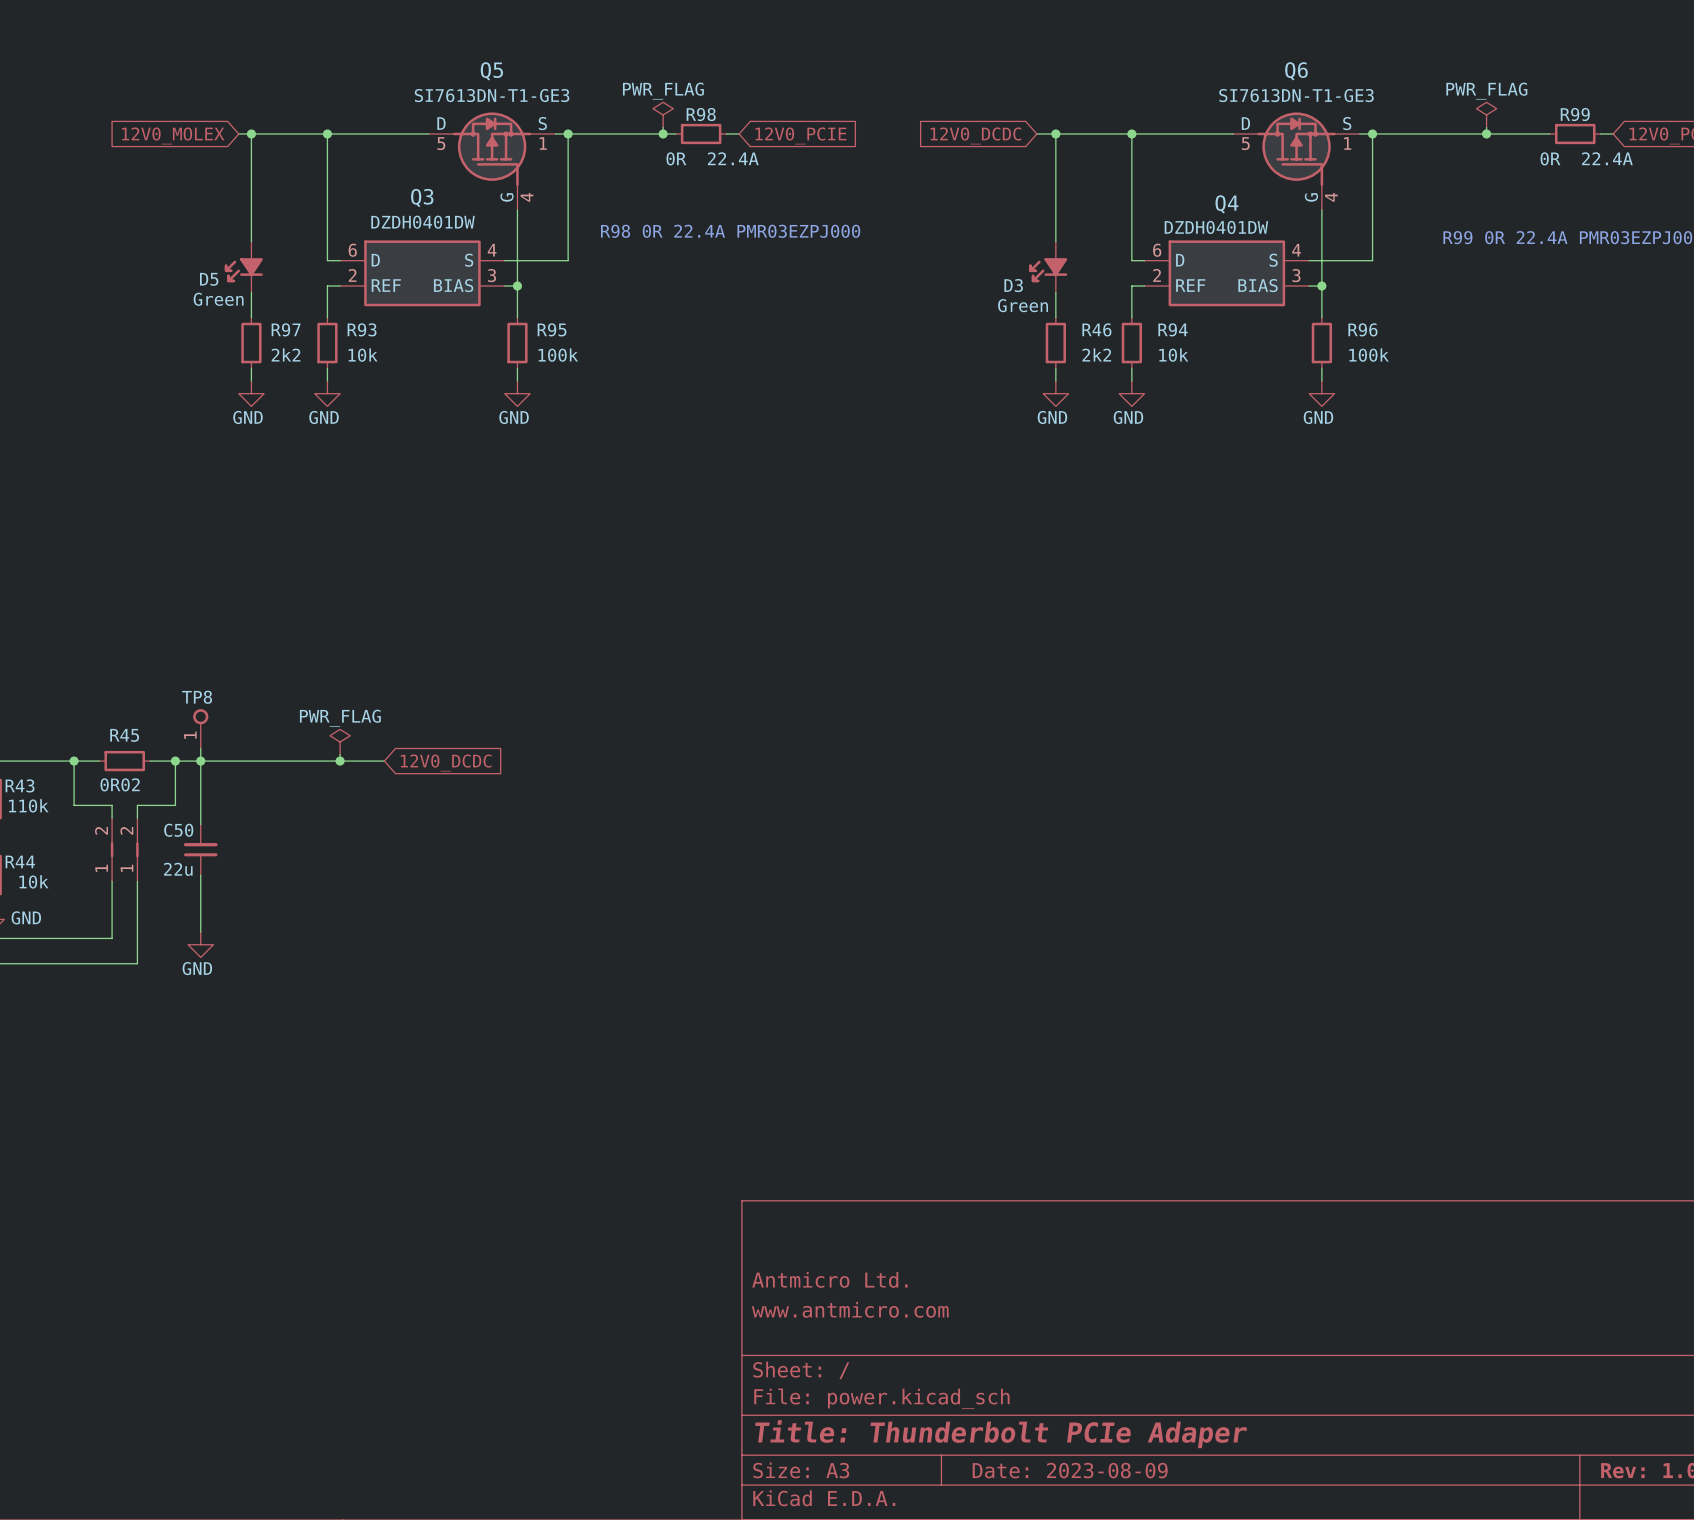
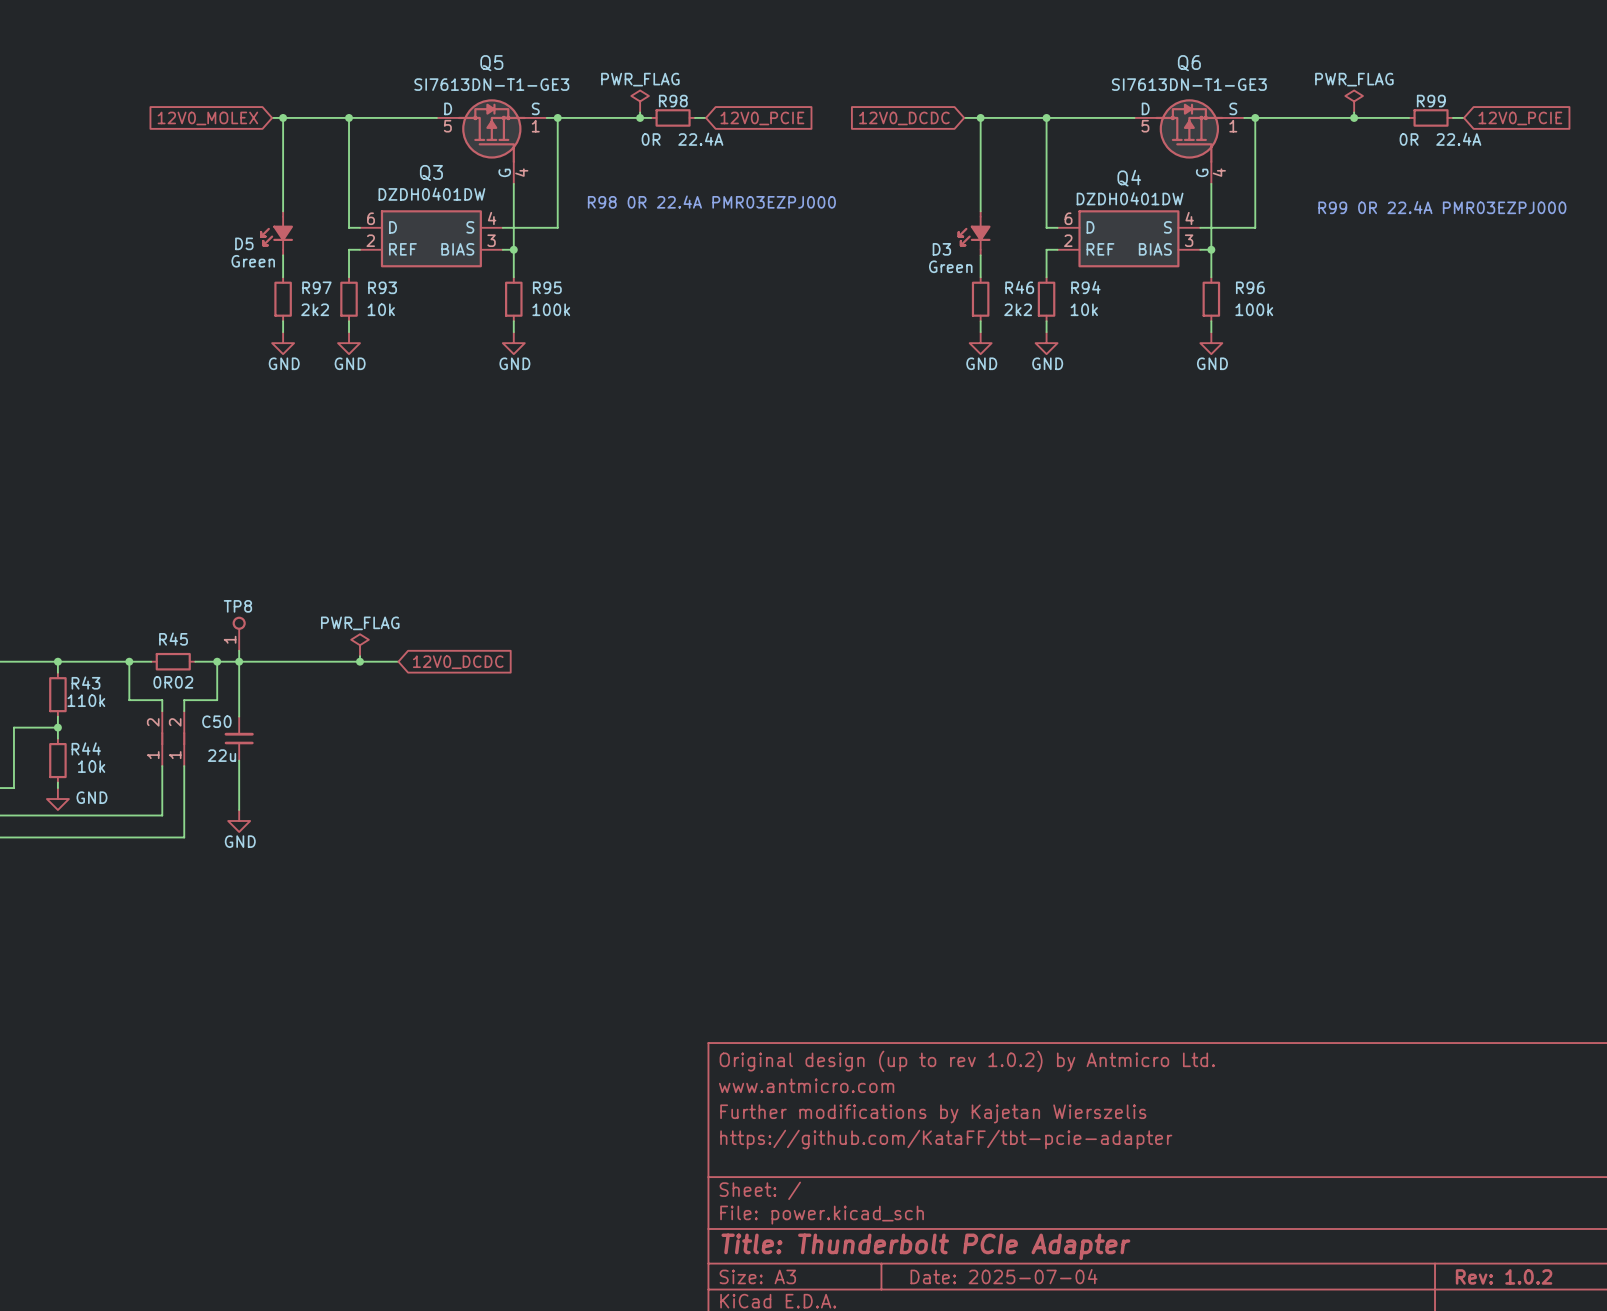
title block: none -> Original design (up to rev 1.0.2) by Antmicro Ltd. (967, 1061)
title block: none -> www.antmicro.com (806, 1085)
title block: Antmicro Ltd. (829, 1279) -> Further modifications by Kajetan Wierszelis (933, 1113)
title block: www.antmicro.com (850, 1309) -> https://github.com/KataFF/tbt-pcie-adapter (946, 1139)
title block: Title: Thunderbolt PCIe Adaper (1001, 1434) -> Title: Thunderbolt PCIe Adapter (925, 1246)
title block: Date: 2023-08-09 (1070, 1470) -> Date: 2025-07-04 (1004, 1276)

